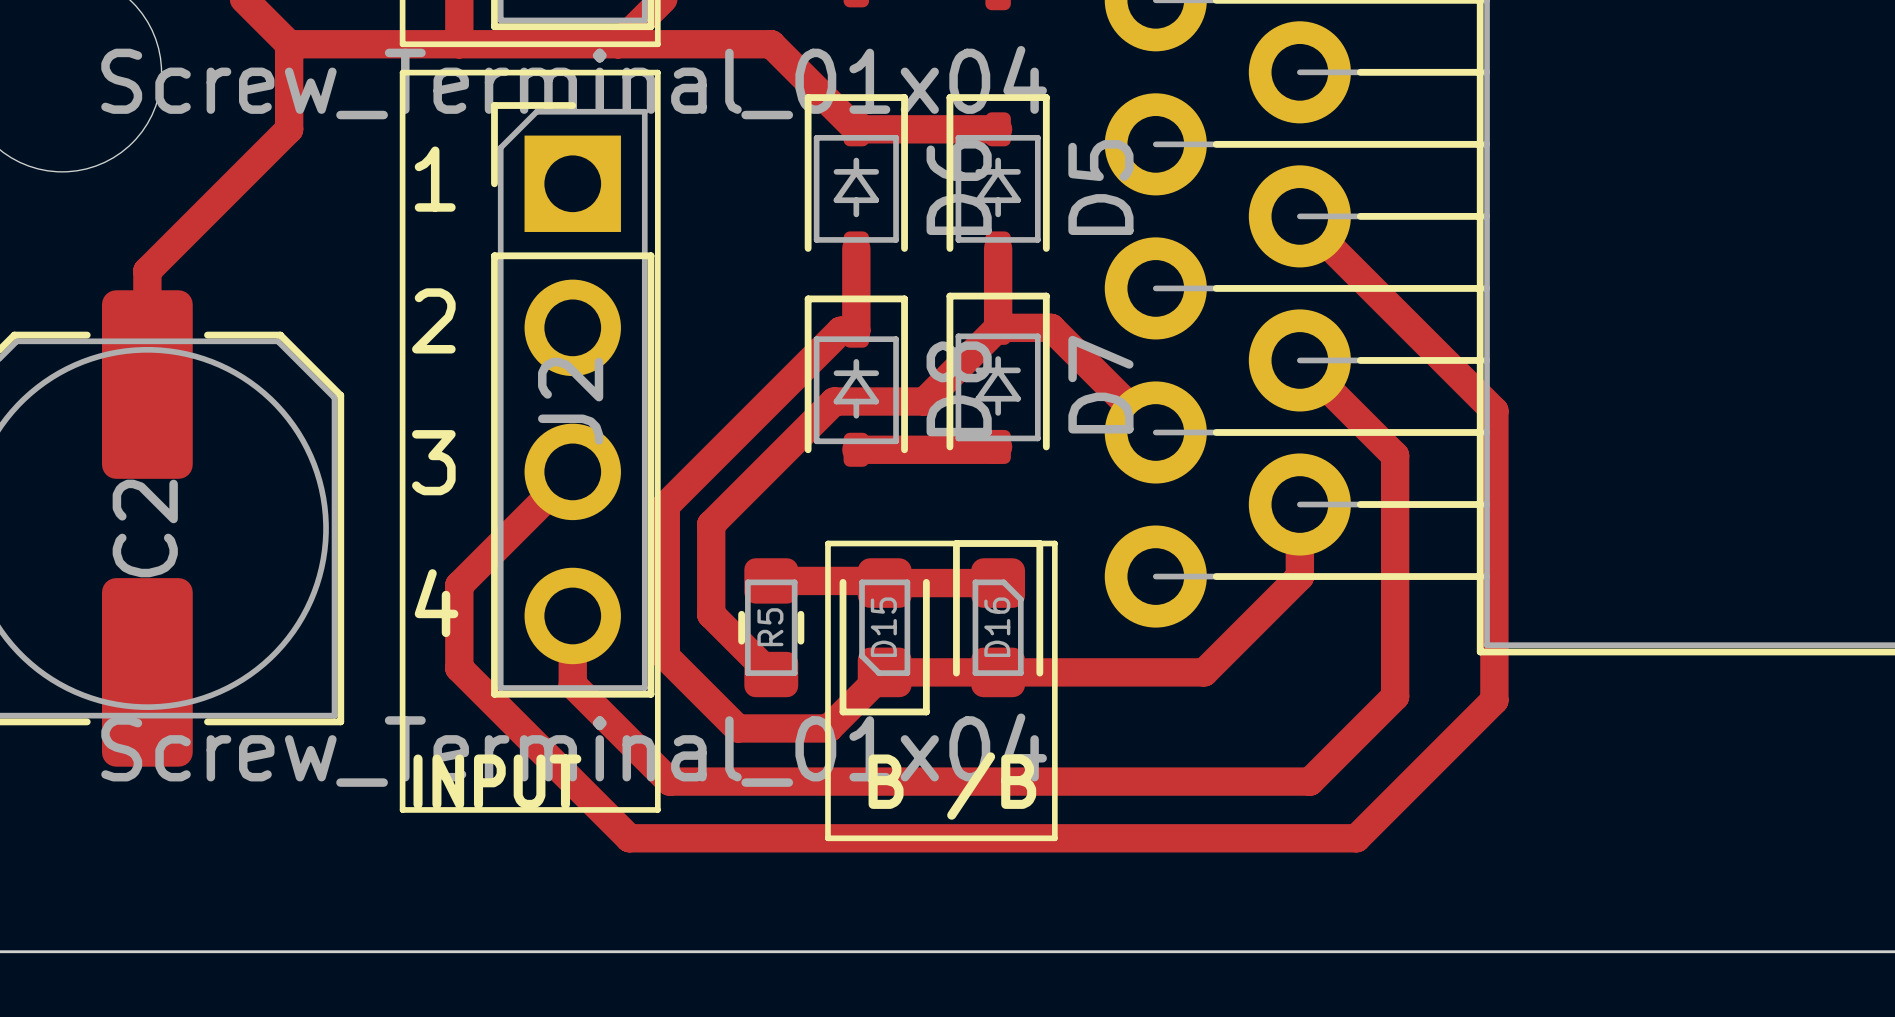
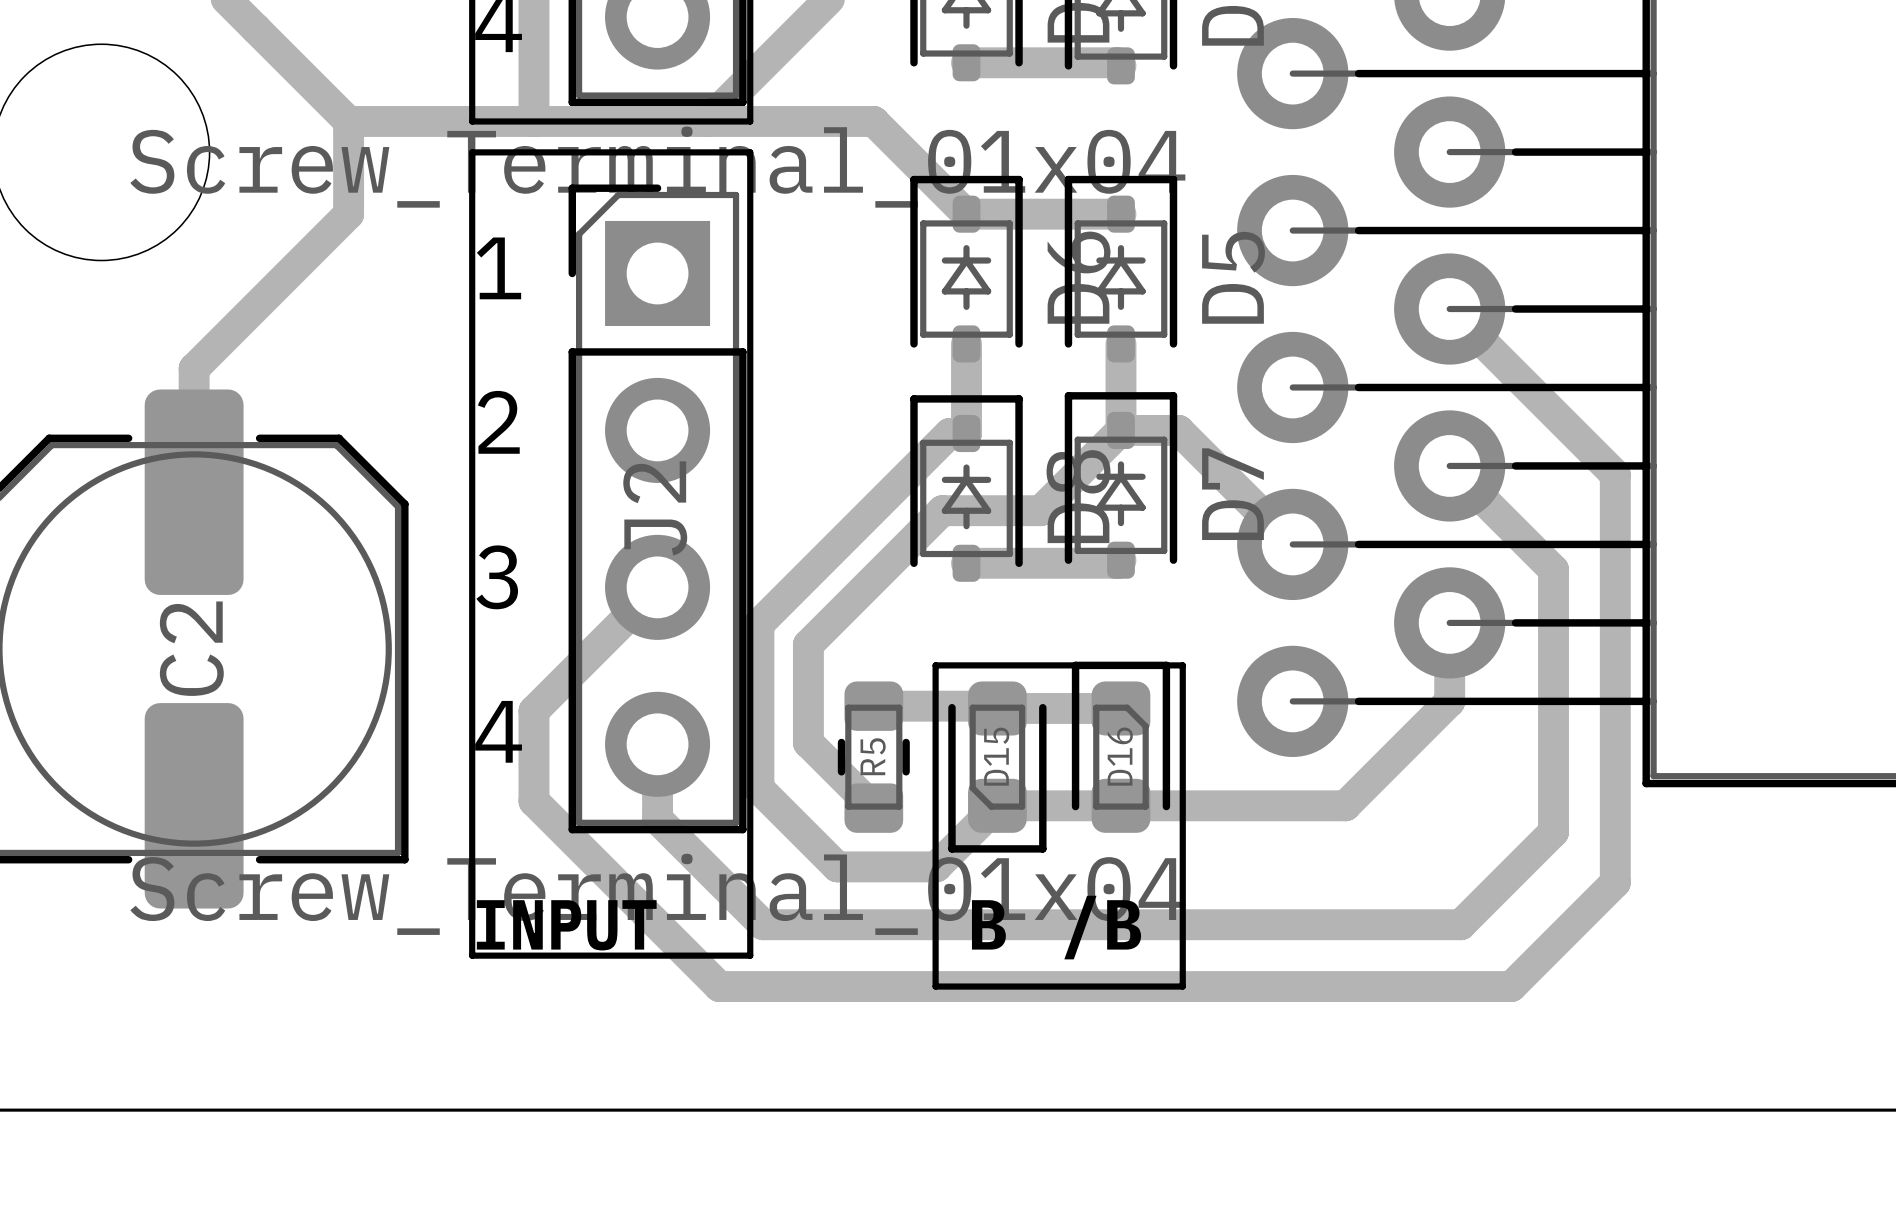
track: (1451, 368) (1494, 410) (1494, 700) (1451, 742) -> (1615, 474) (1615, 882)

